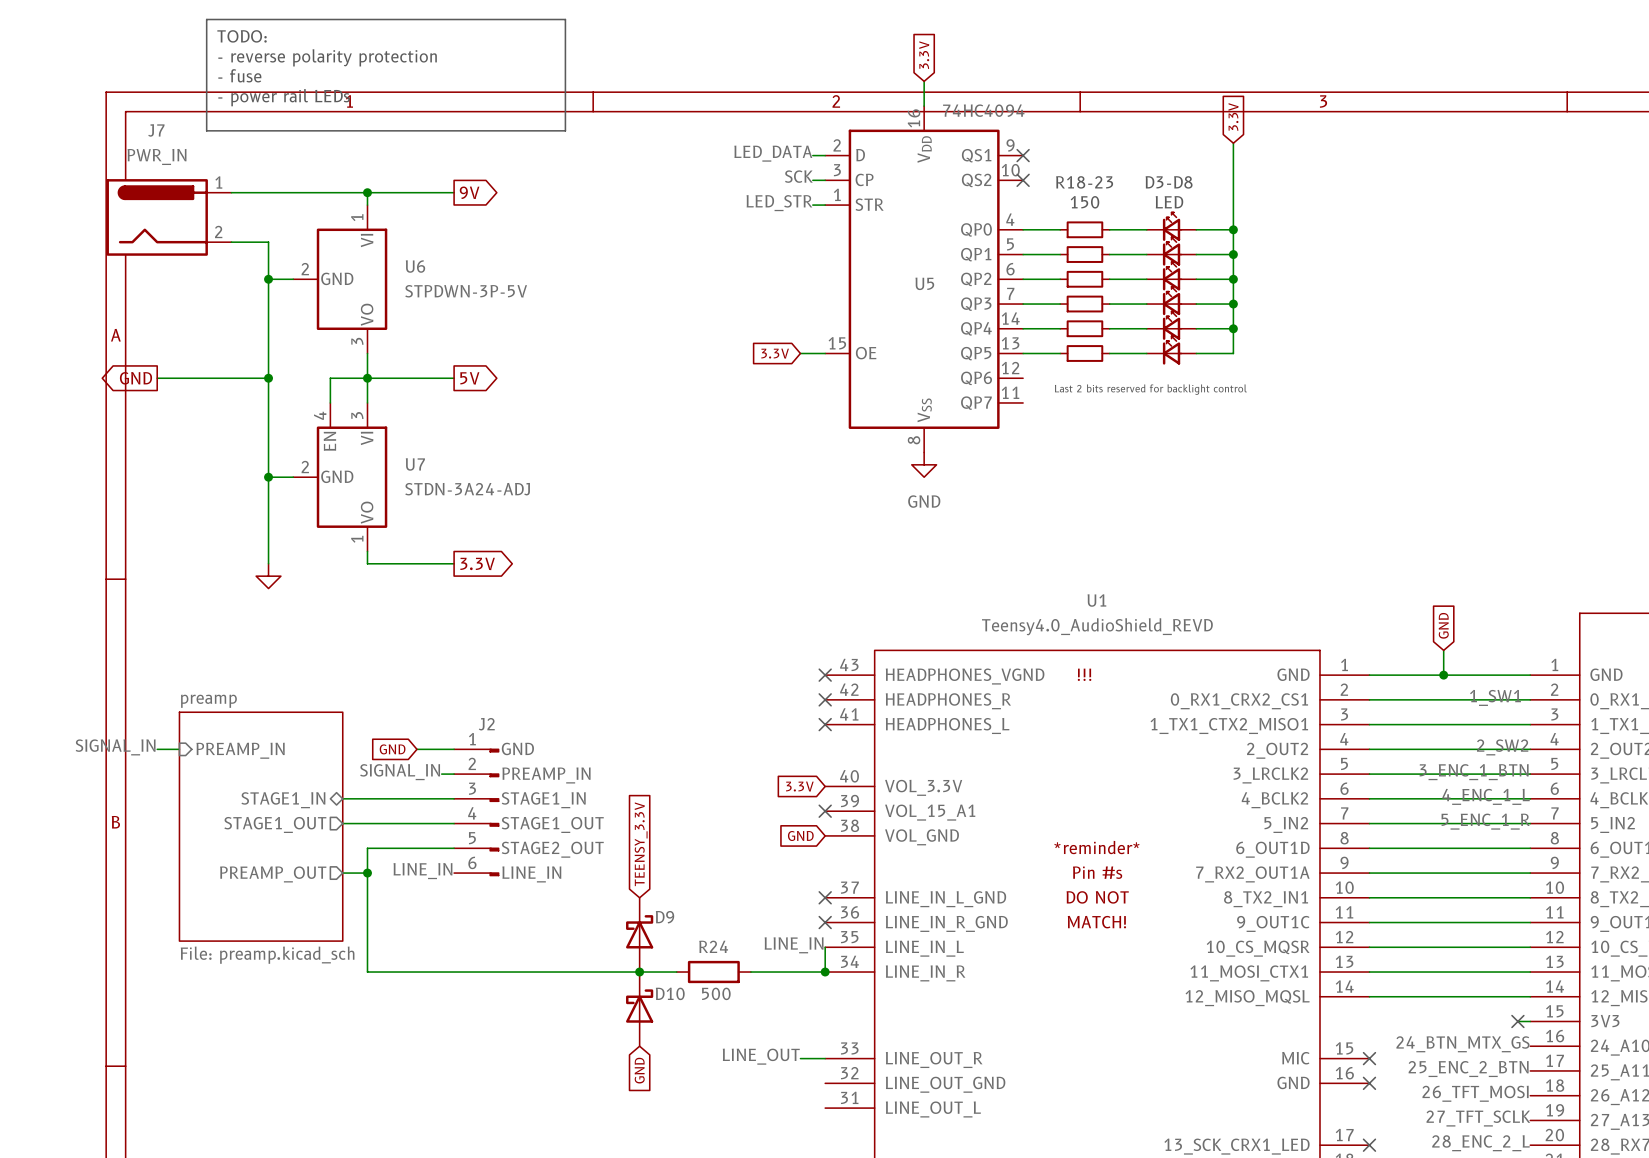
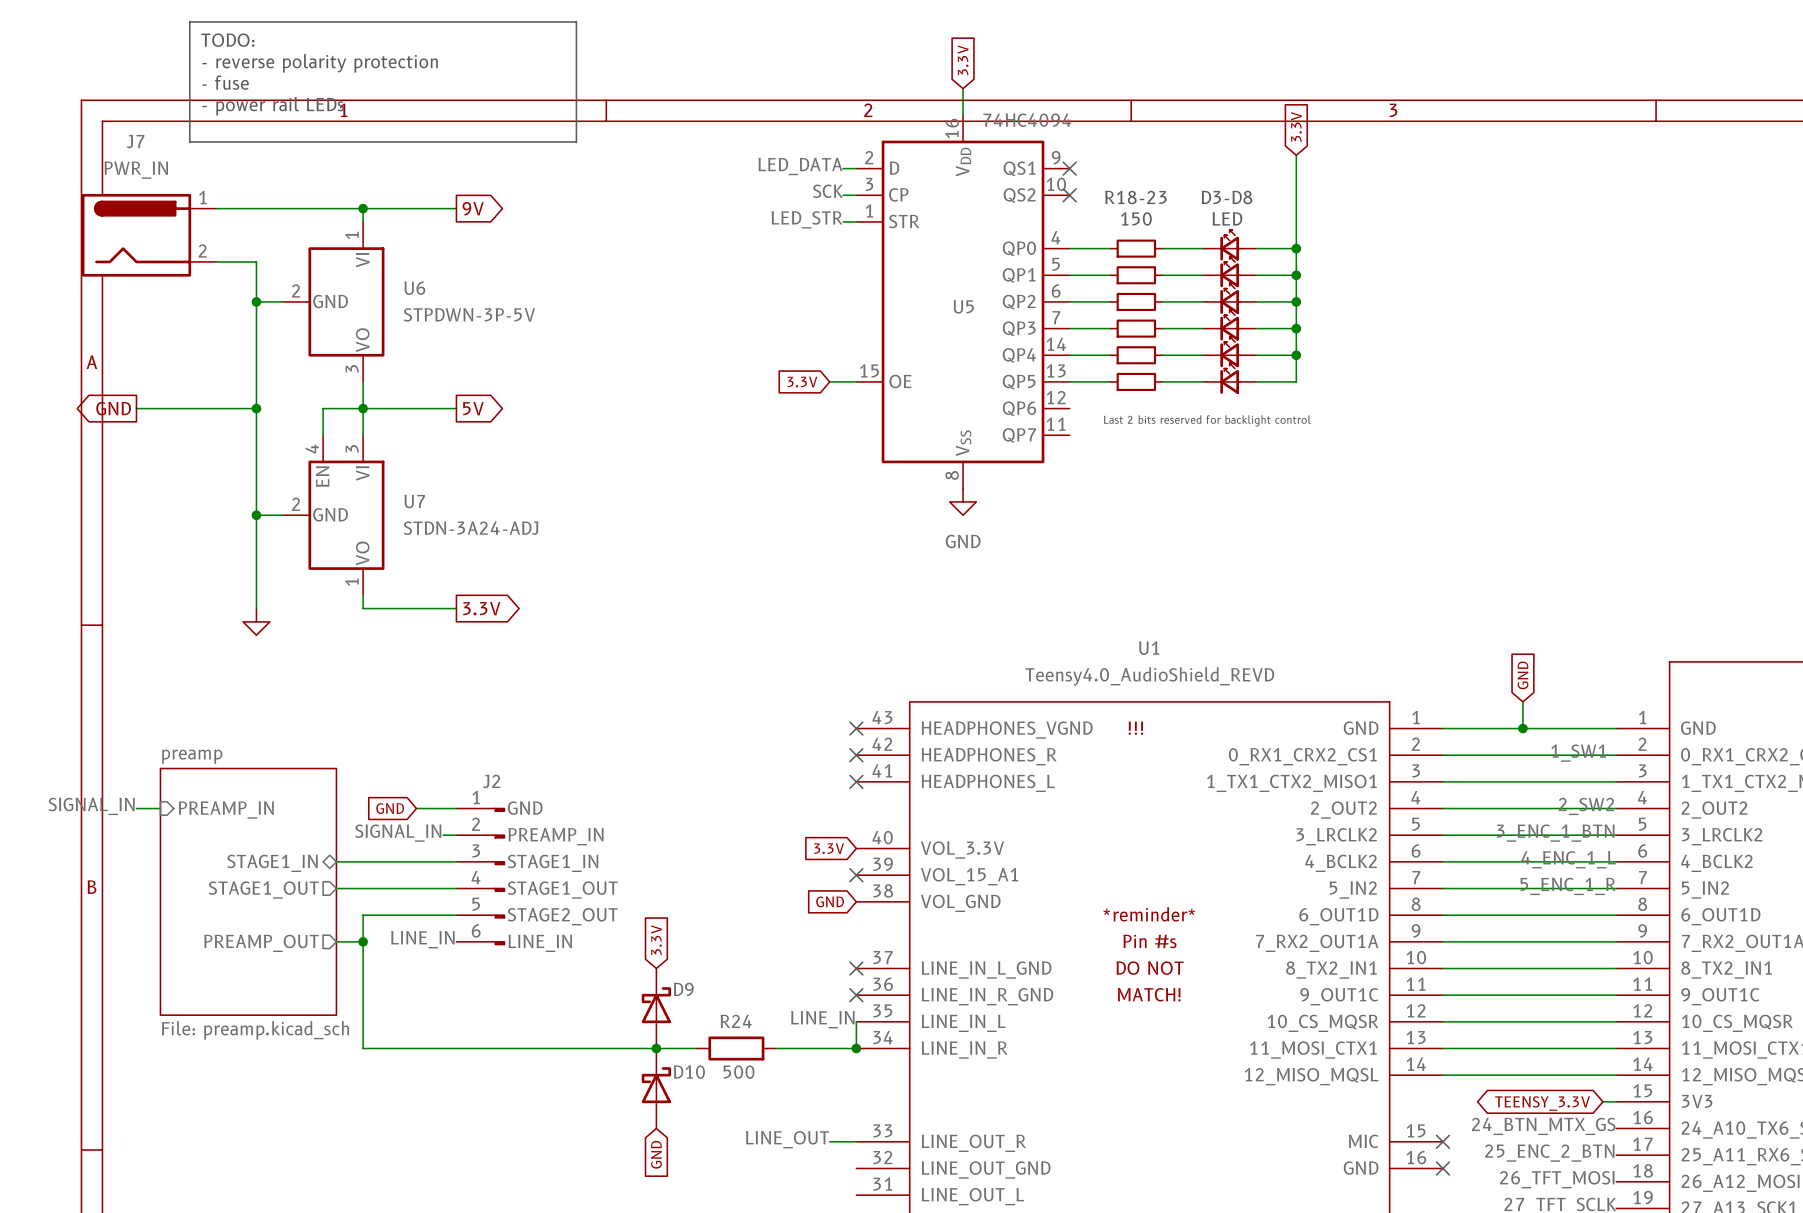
global label: TEENSY_3.3V (641, 844) -> 3.3V (656, 940)
no-connect mark: (1517, 1021) -> none
global label: none -> TEENSY_3.3V (1542, 1103)

